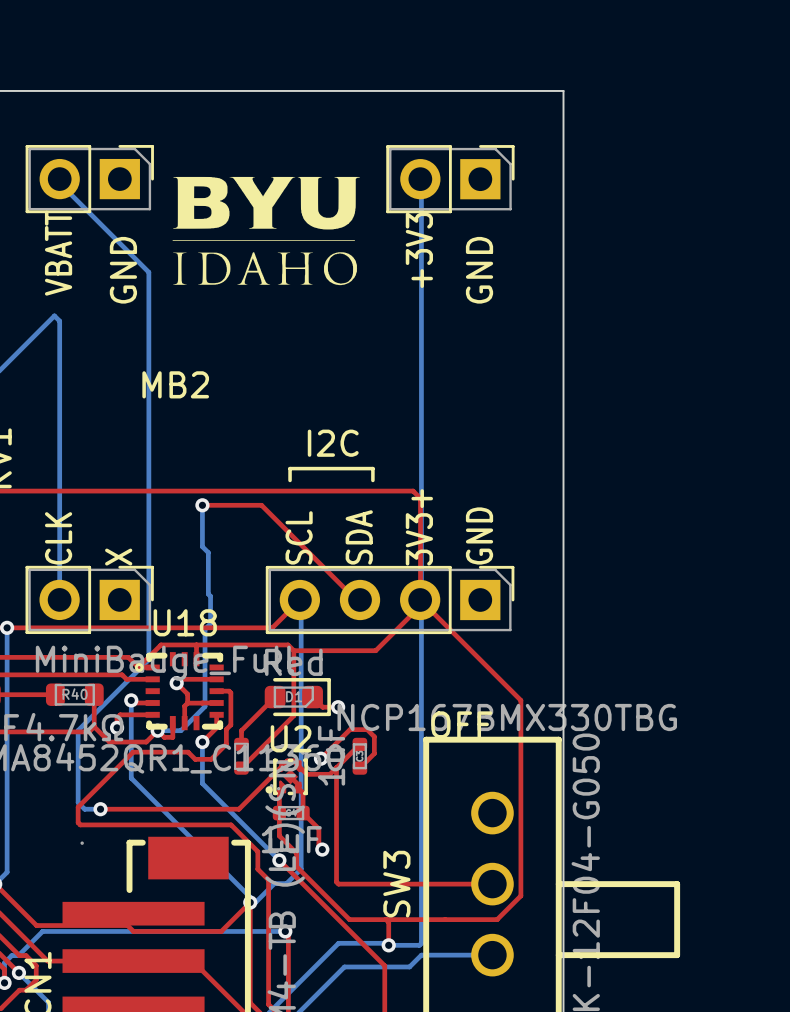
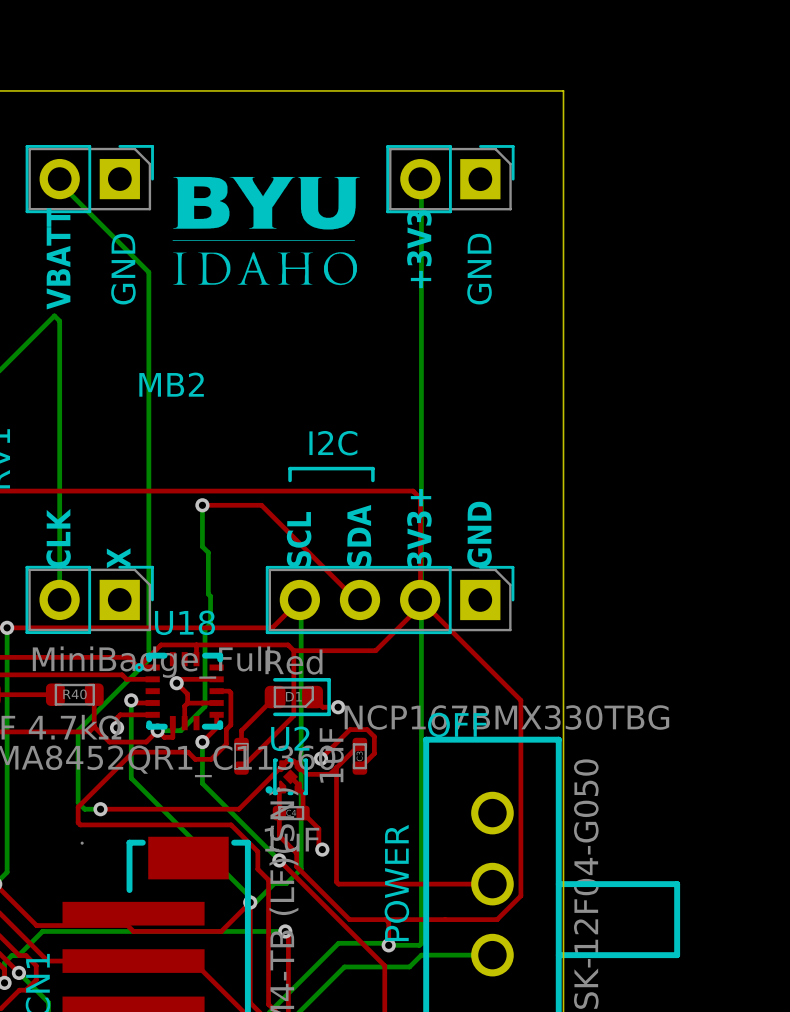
SW3 name: SW3 (396, 884) -> POWER (396, 882)

